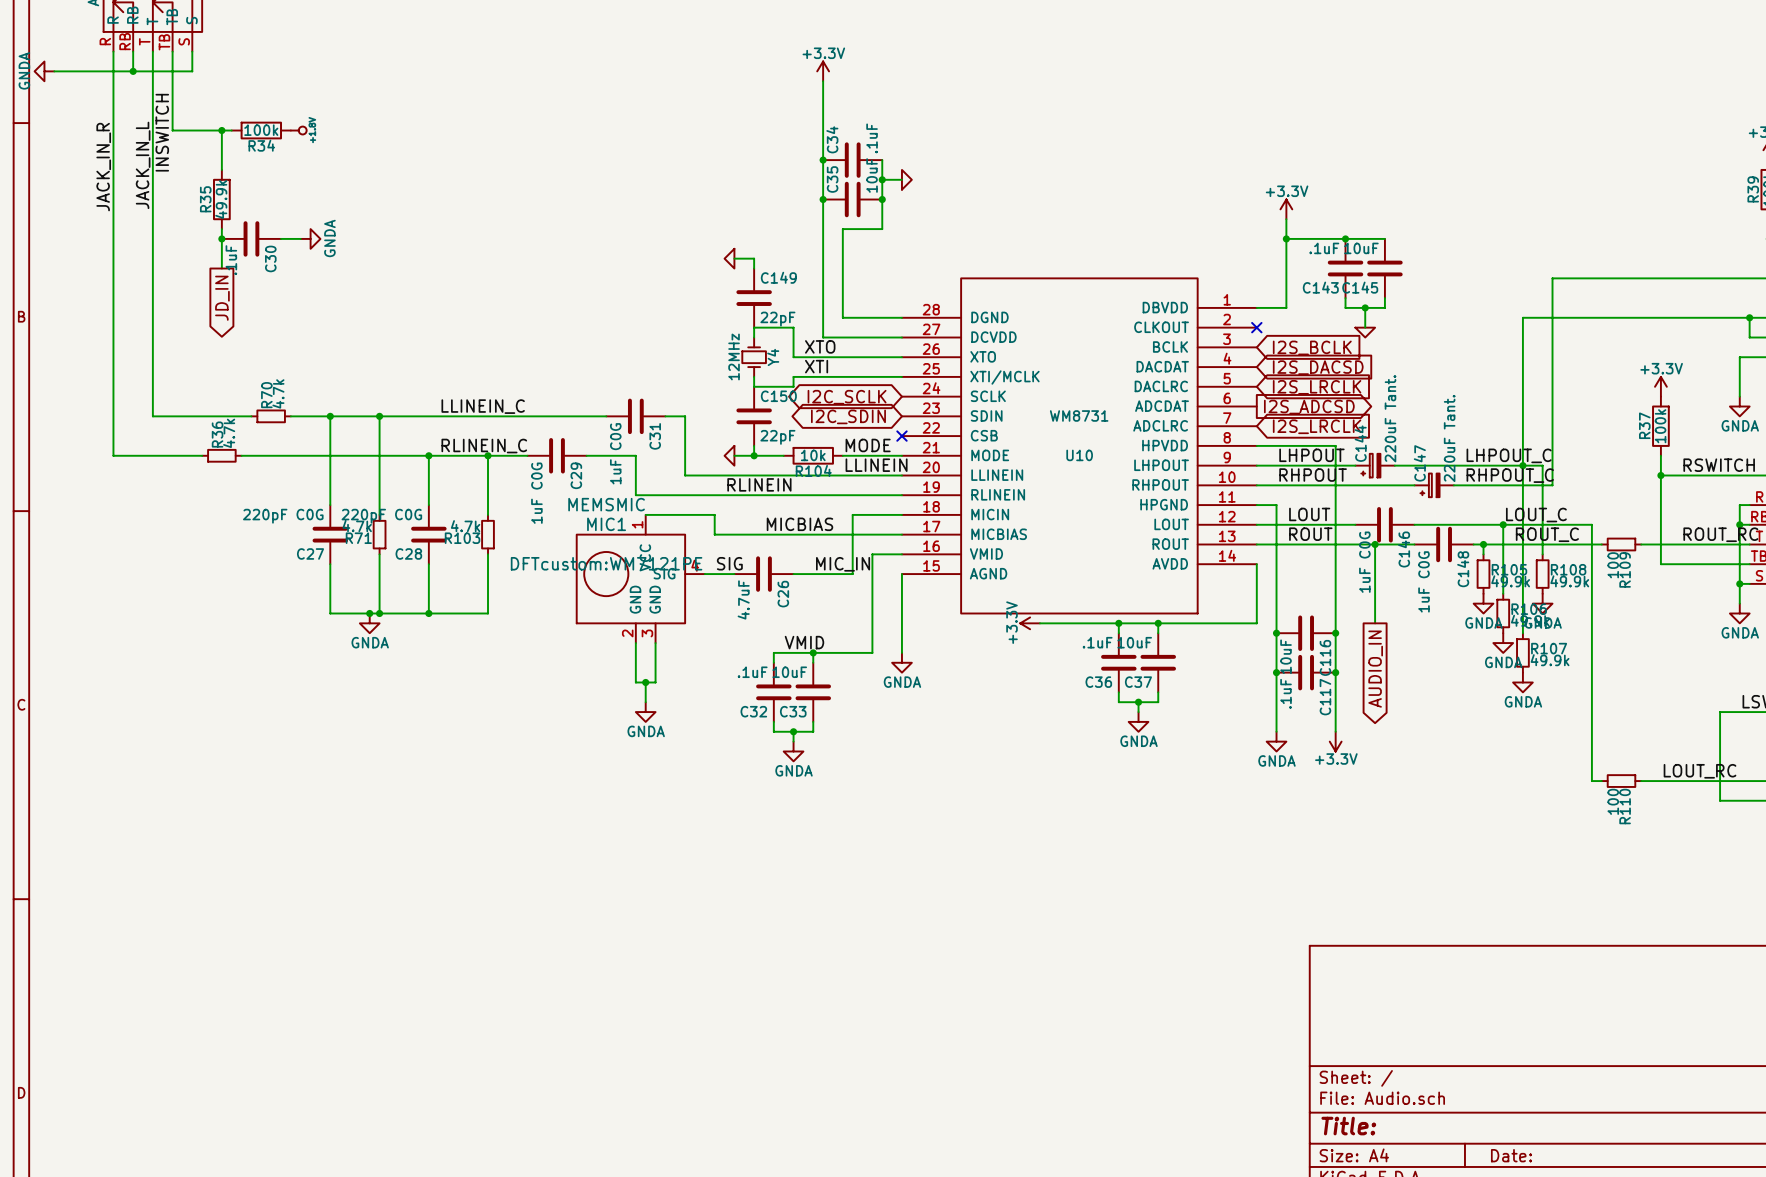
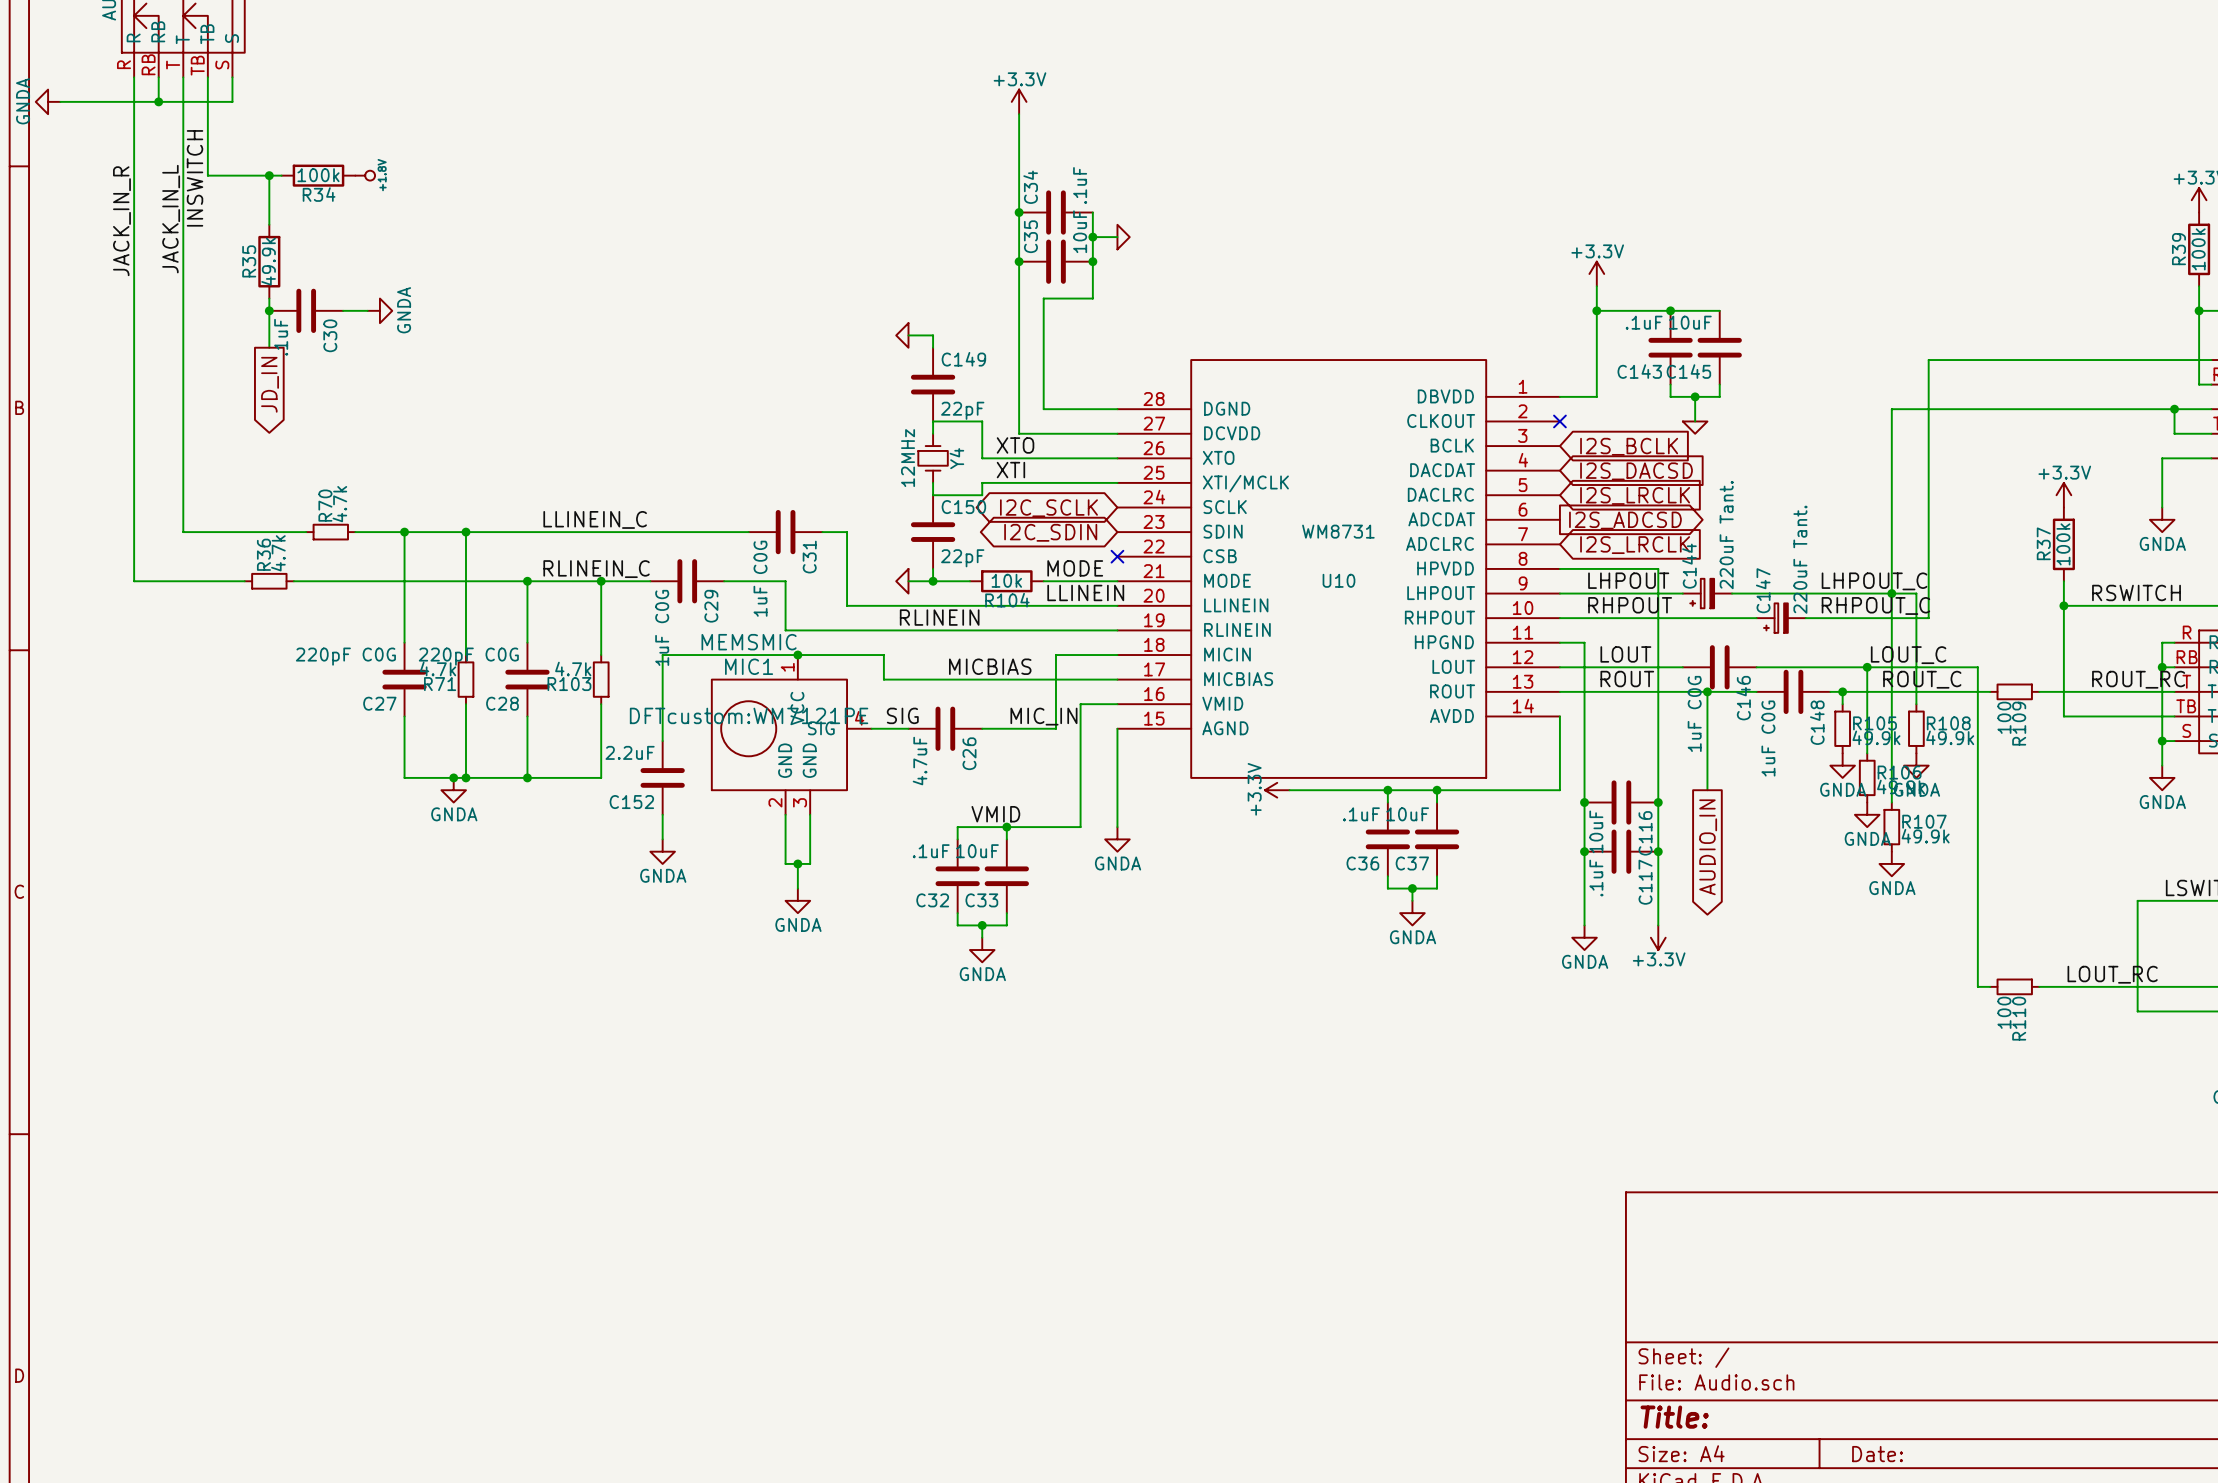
wire: none -> (797, 655) (662, 655) (662, 741)
junction: none -> (797, 655)
C152: none -> 2.2uF (662, 777)
wire: none -> (662, 814) (662, 839)
power symbol: none -> GNDA (662, 851)

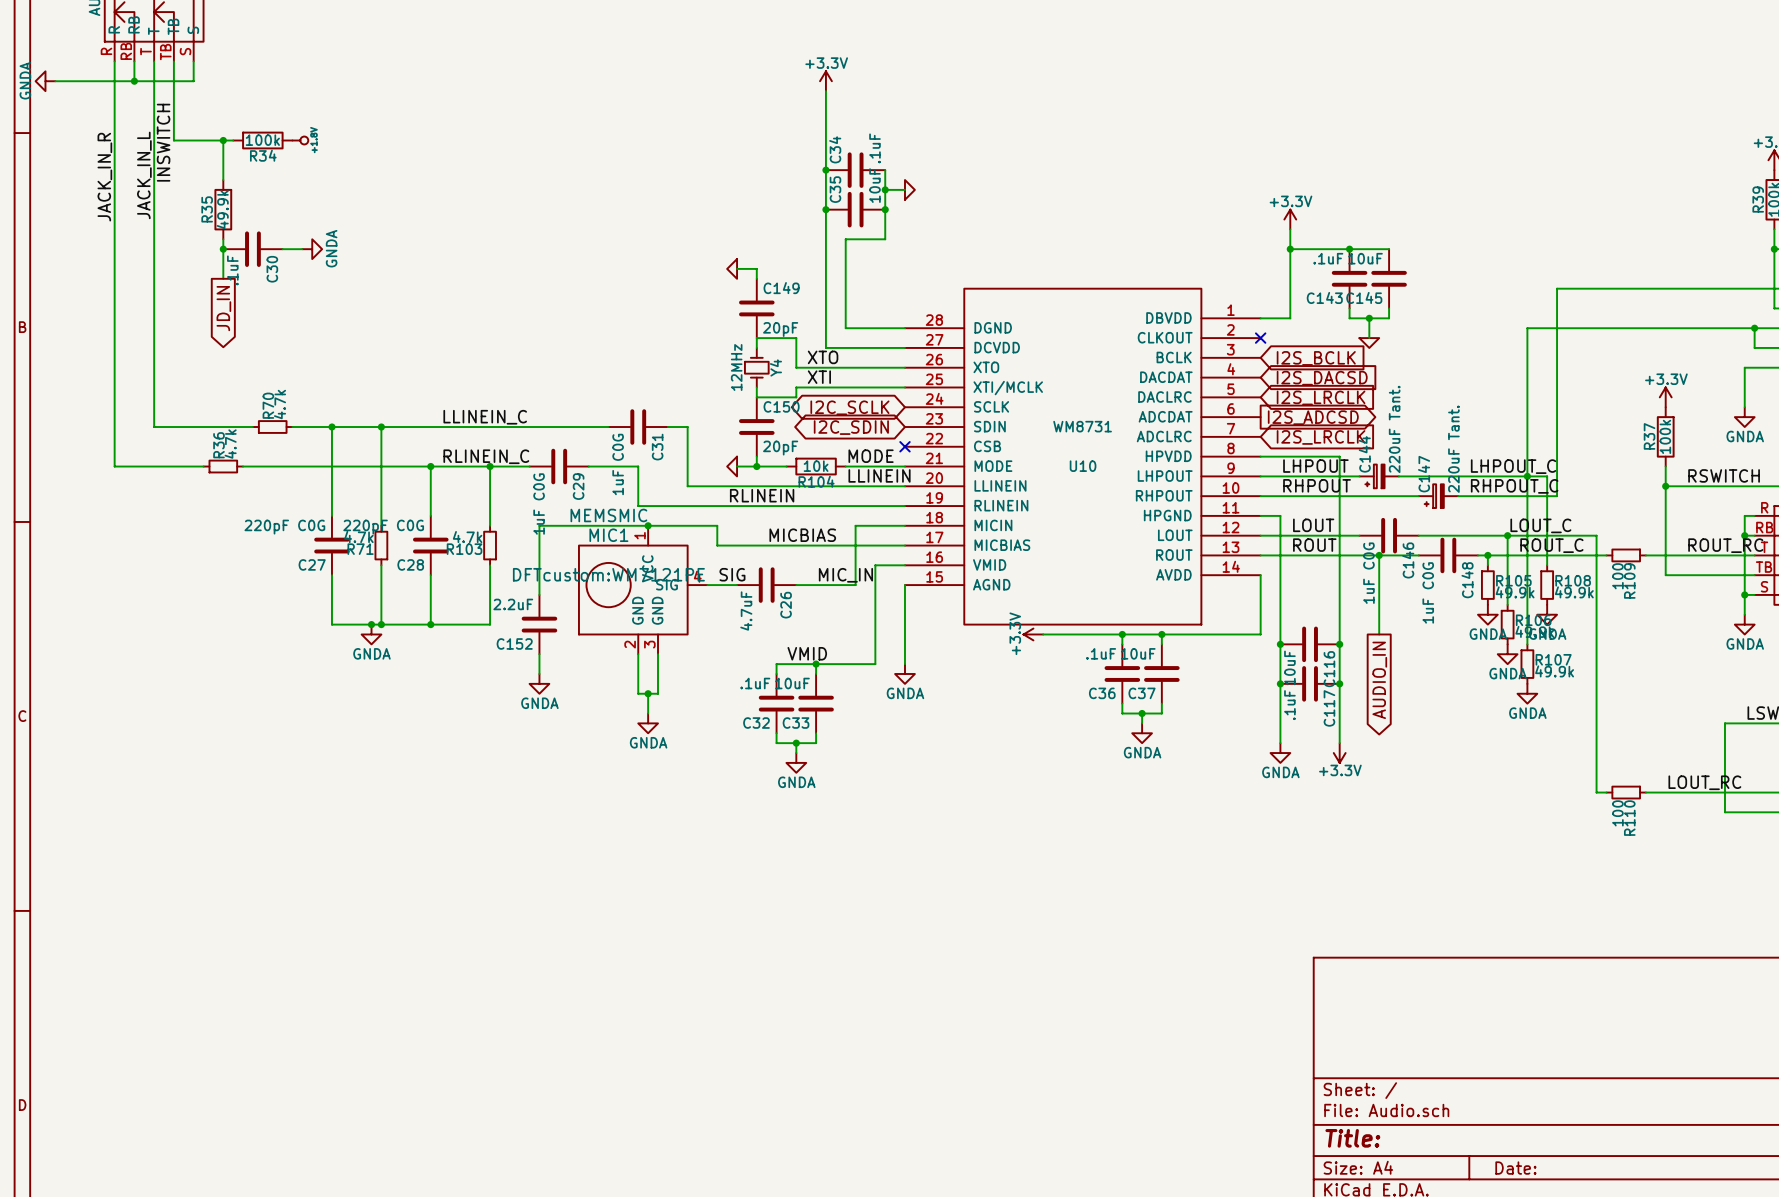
C149 value: 22pF (962, 410) -> 20pF (780, 329)
C150 value: 22pF (962, 558) -> 20pF (780, 448)

